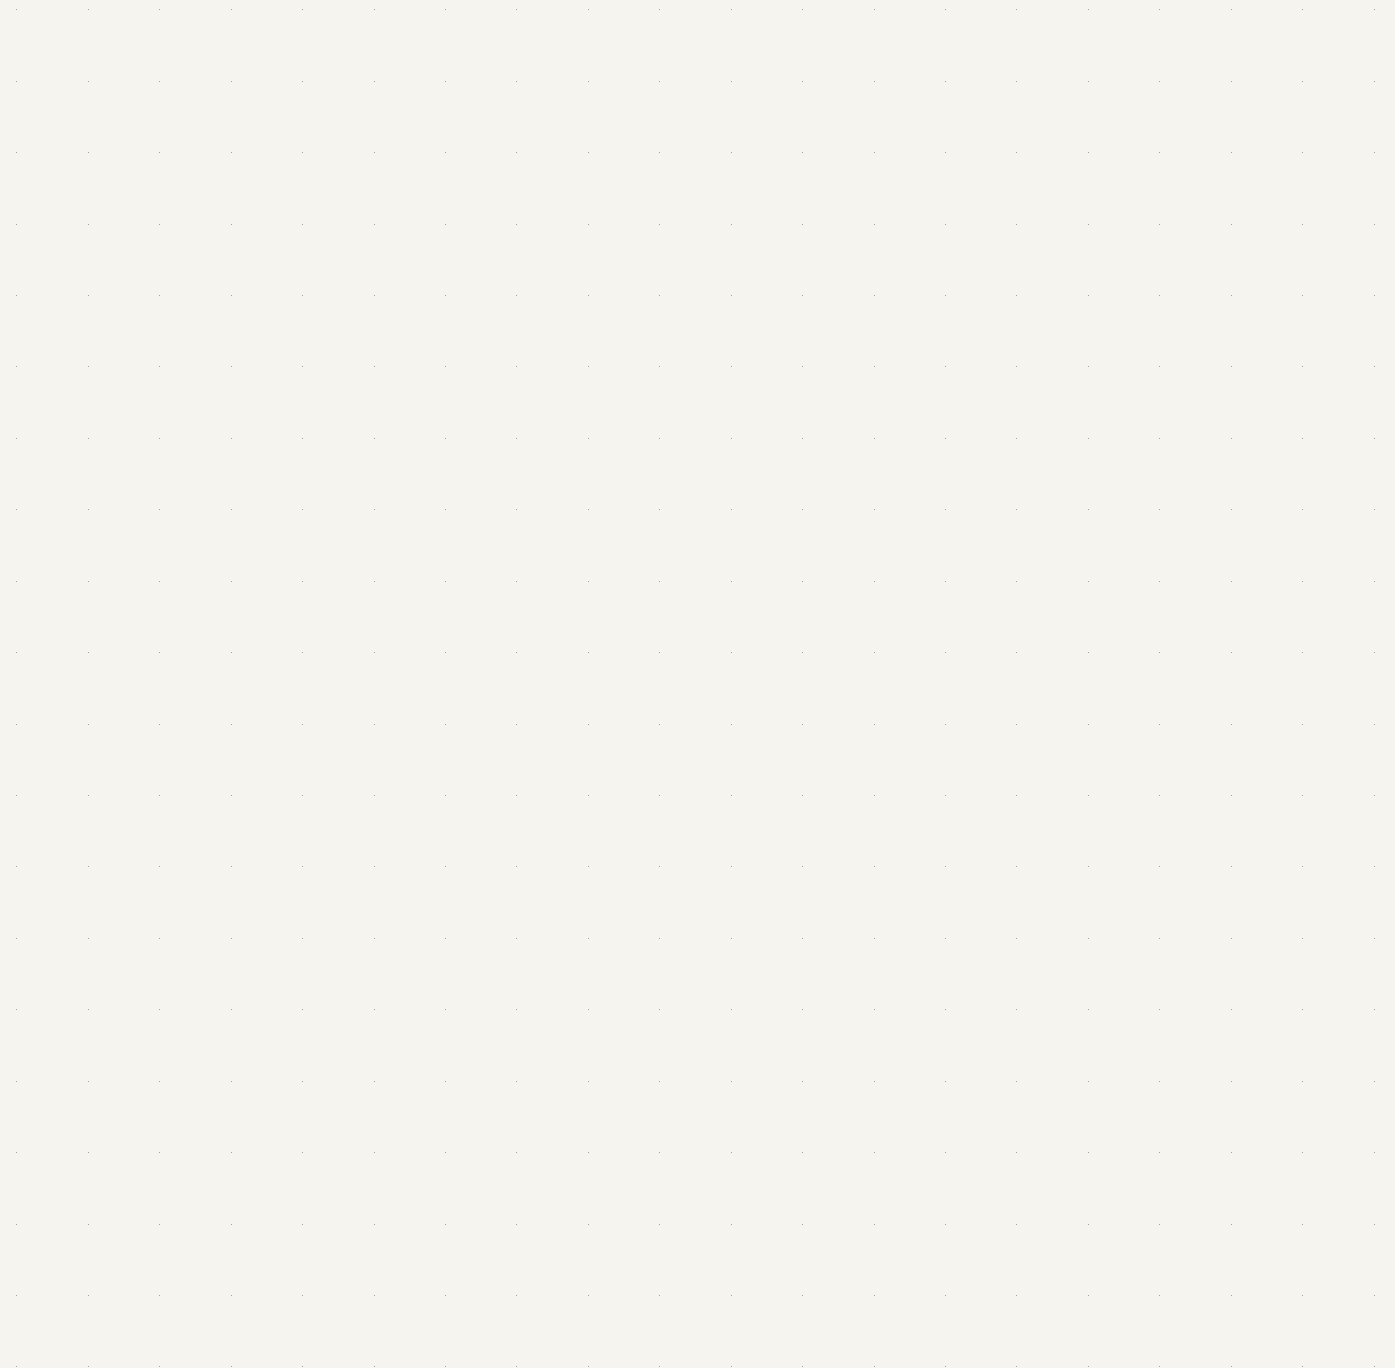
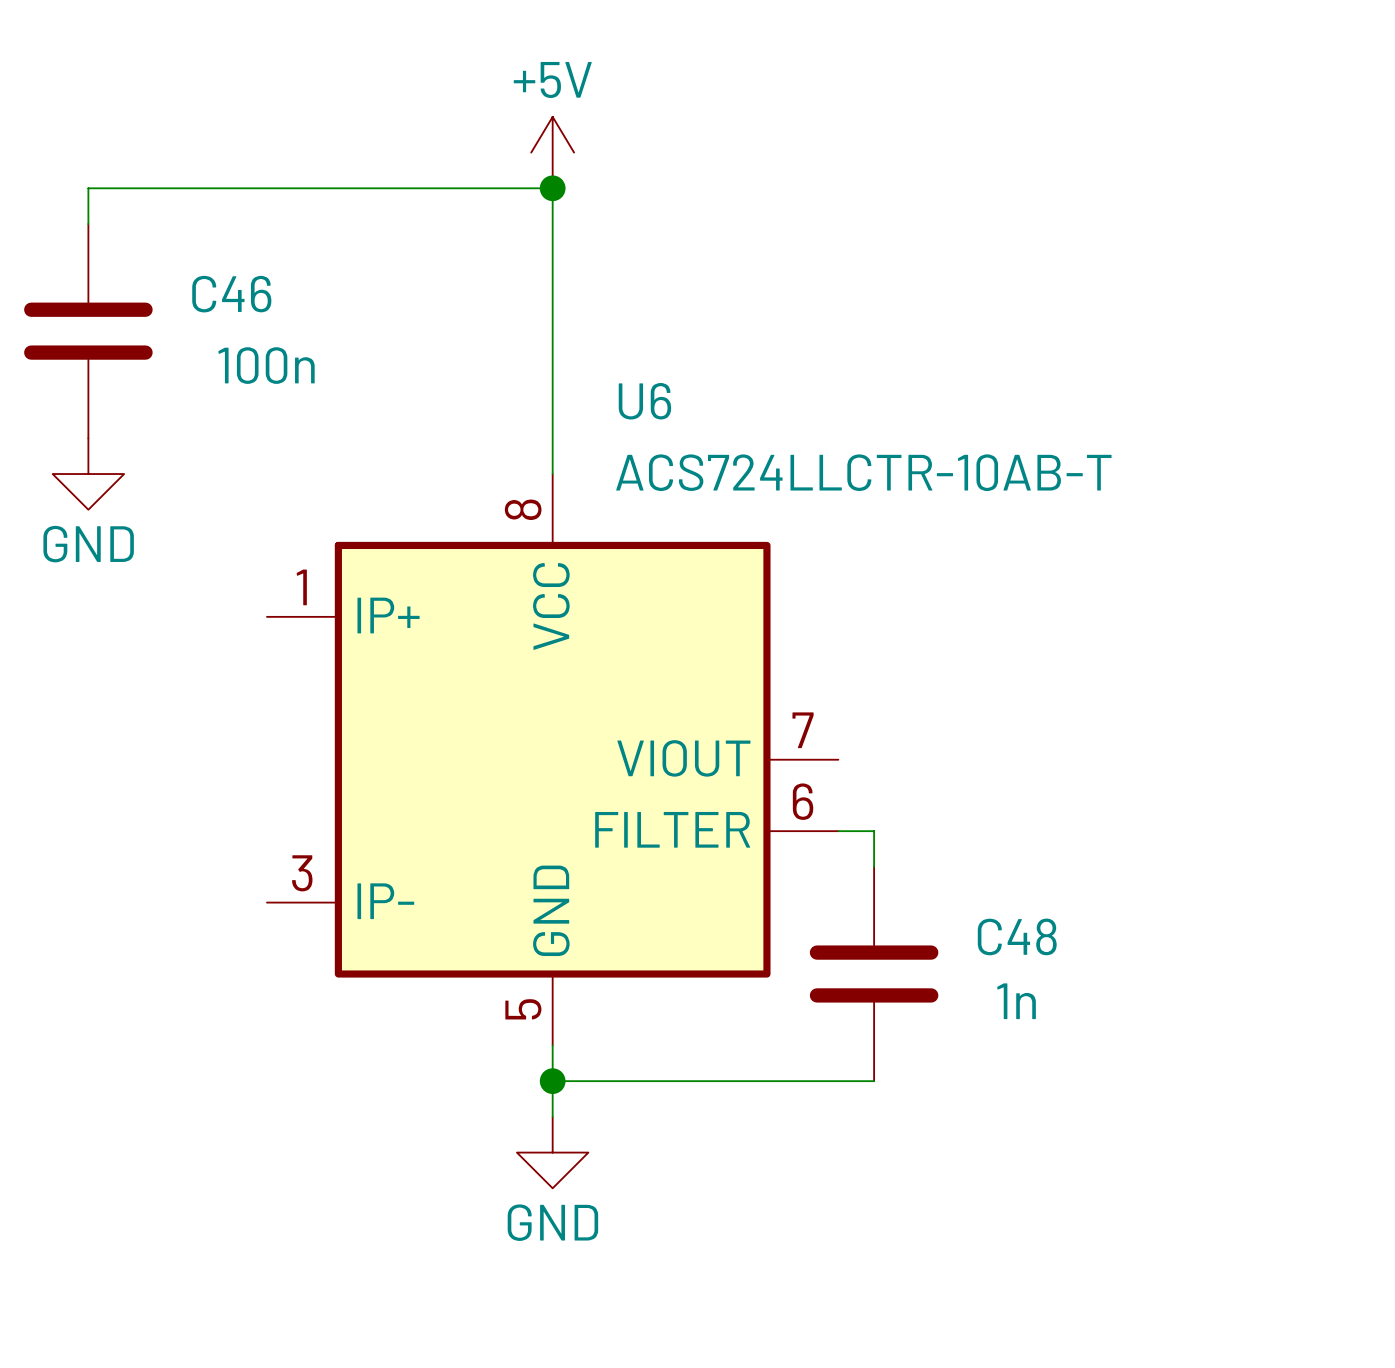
power symbol: none -> +5V (552, 152)
junction: none -> (552, 188)
wire: none -> (88, 224) (88, 188) (552, 188) (552, 474)
C46: none -> 100n (88, 331)
power symbol: none -> GND (88, 474)
U6: none -> ACS724LLCTR-10AB-T (552, 759)
wire: none -> (838, 831) (874, 831) (874, 866)
C48: none -> 1n (874, 974)
wire: none -> (552, 1045) (552, 1116)
wire: none -> (552, 1081) (874, 1081)
junction: none -> (552, 1081)
power symbol: none -> GND (552, 1152)

